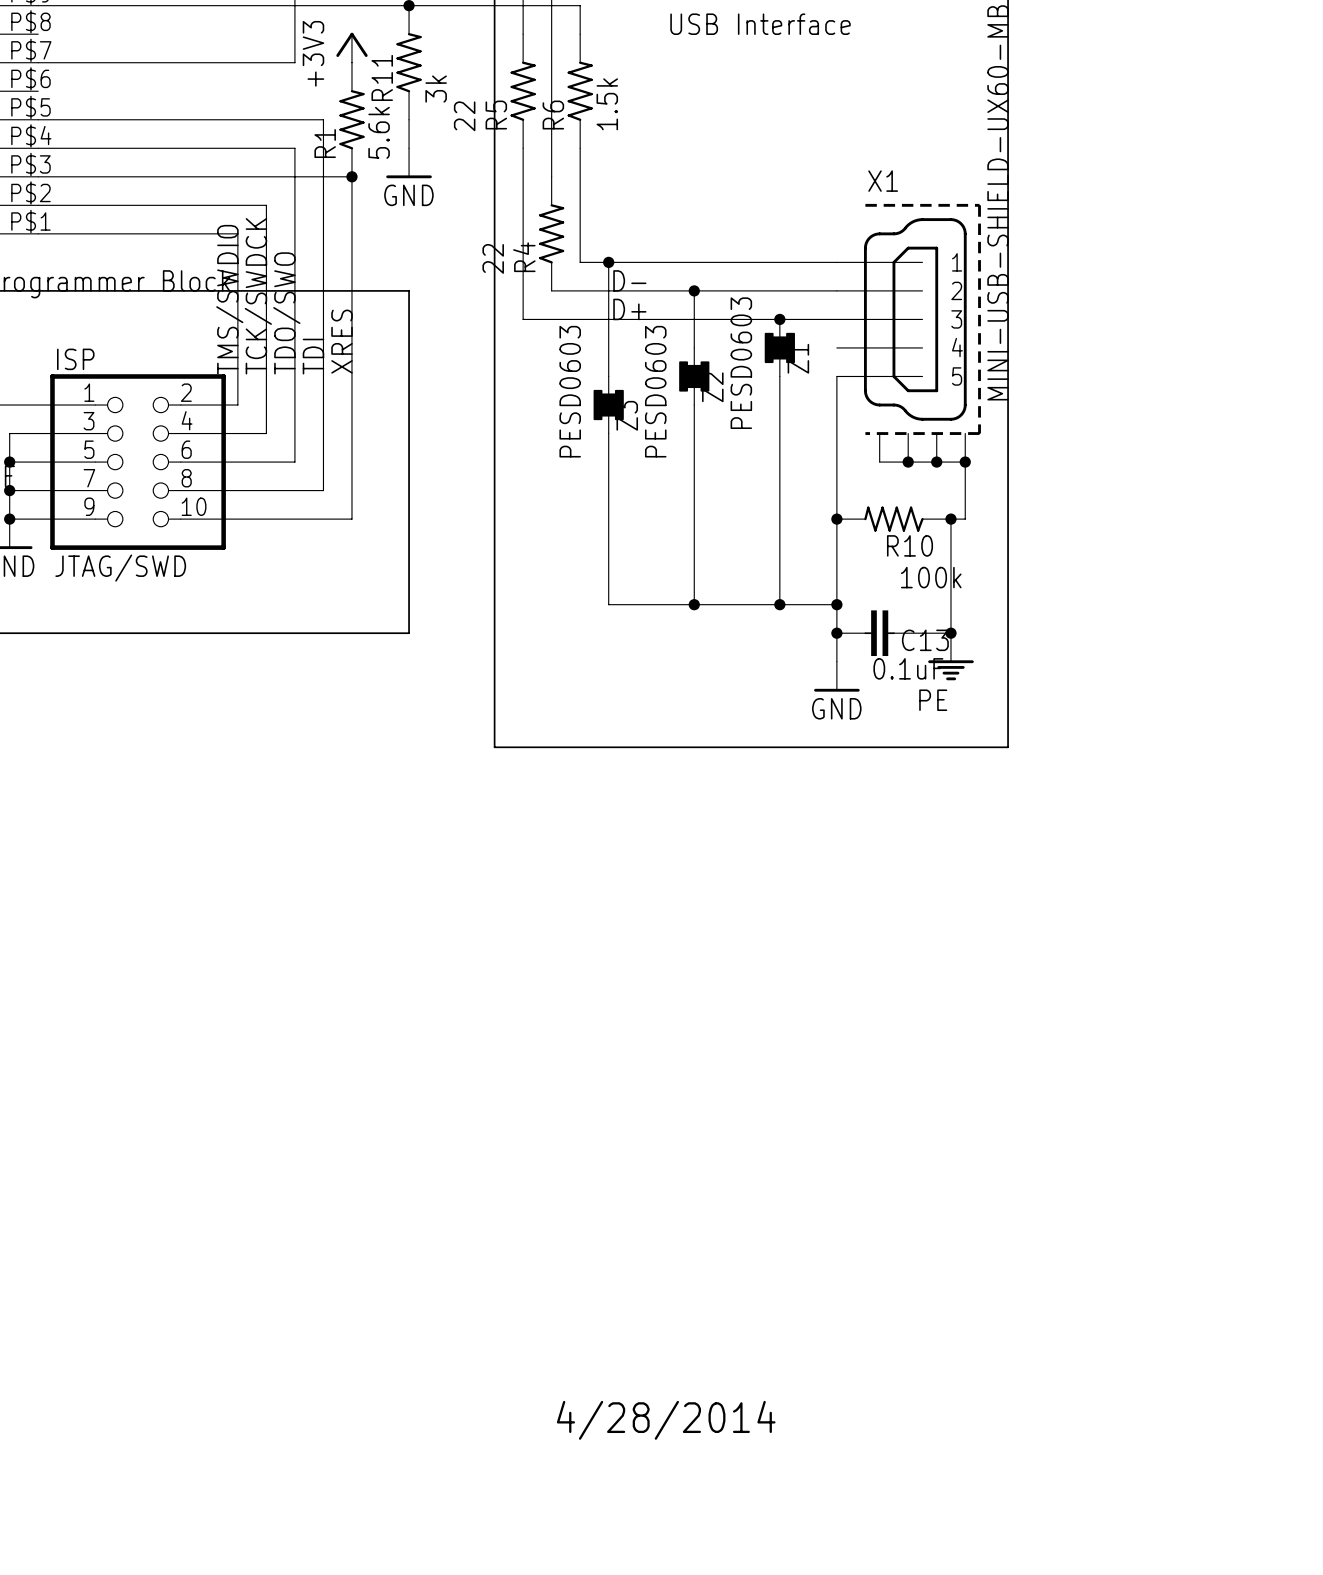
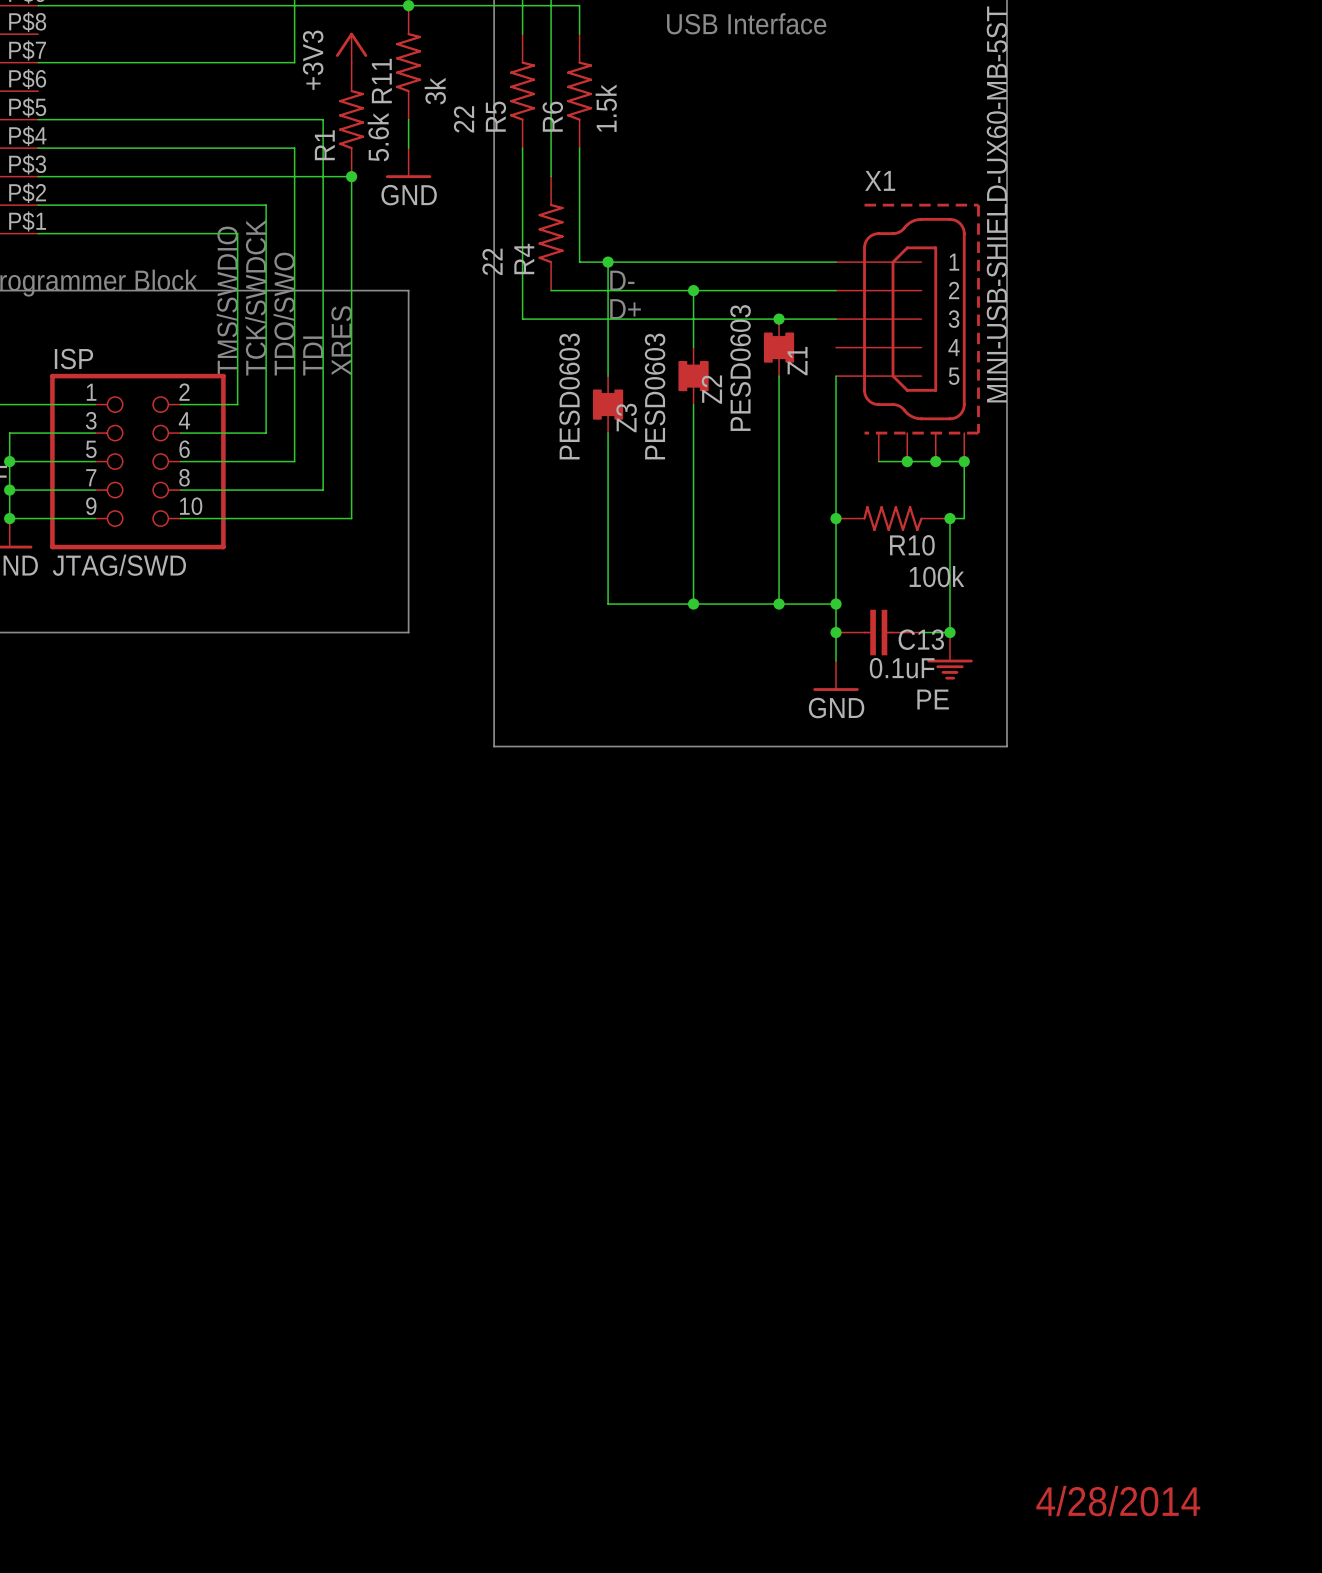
text: 4/28/2014 (666, 1420) -> none
text: none -> 4/28/2014 (1118, 1501)

